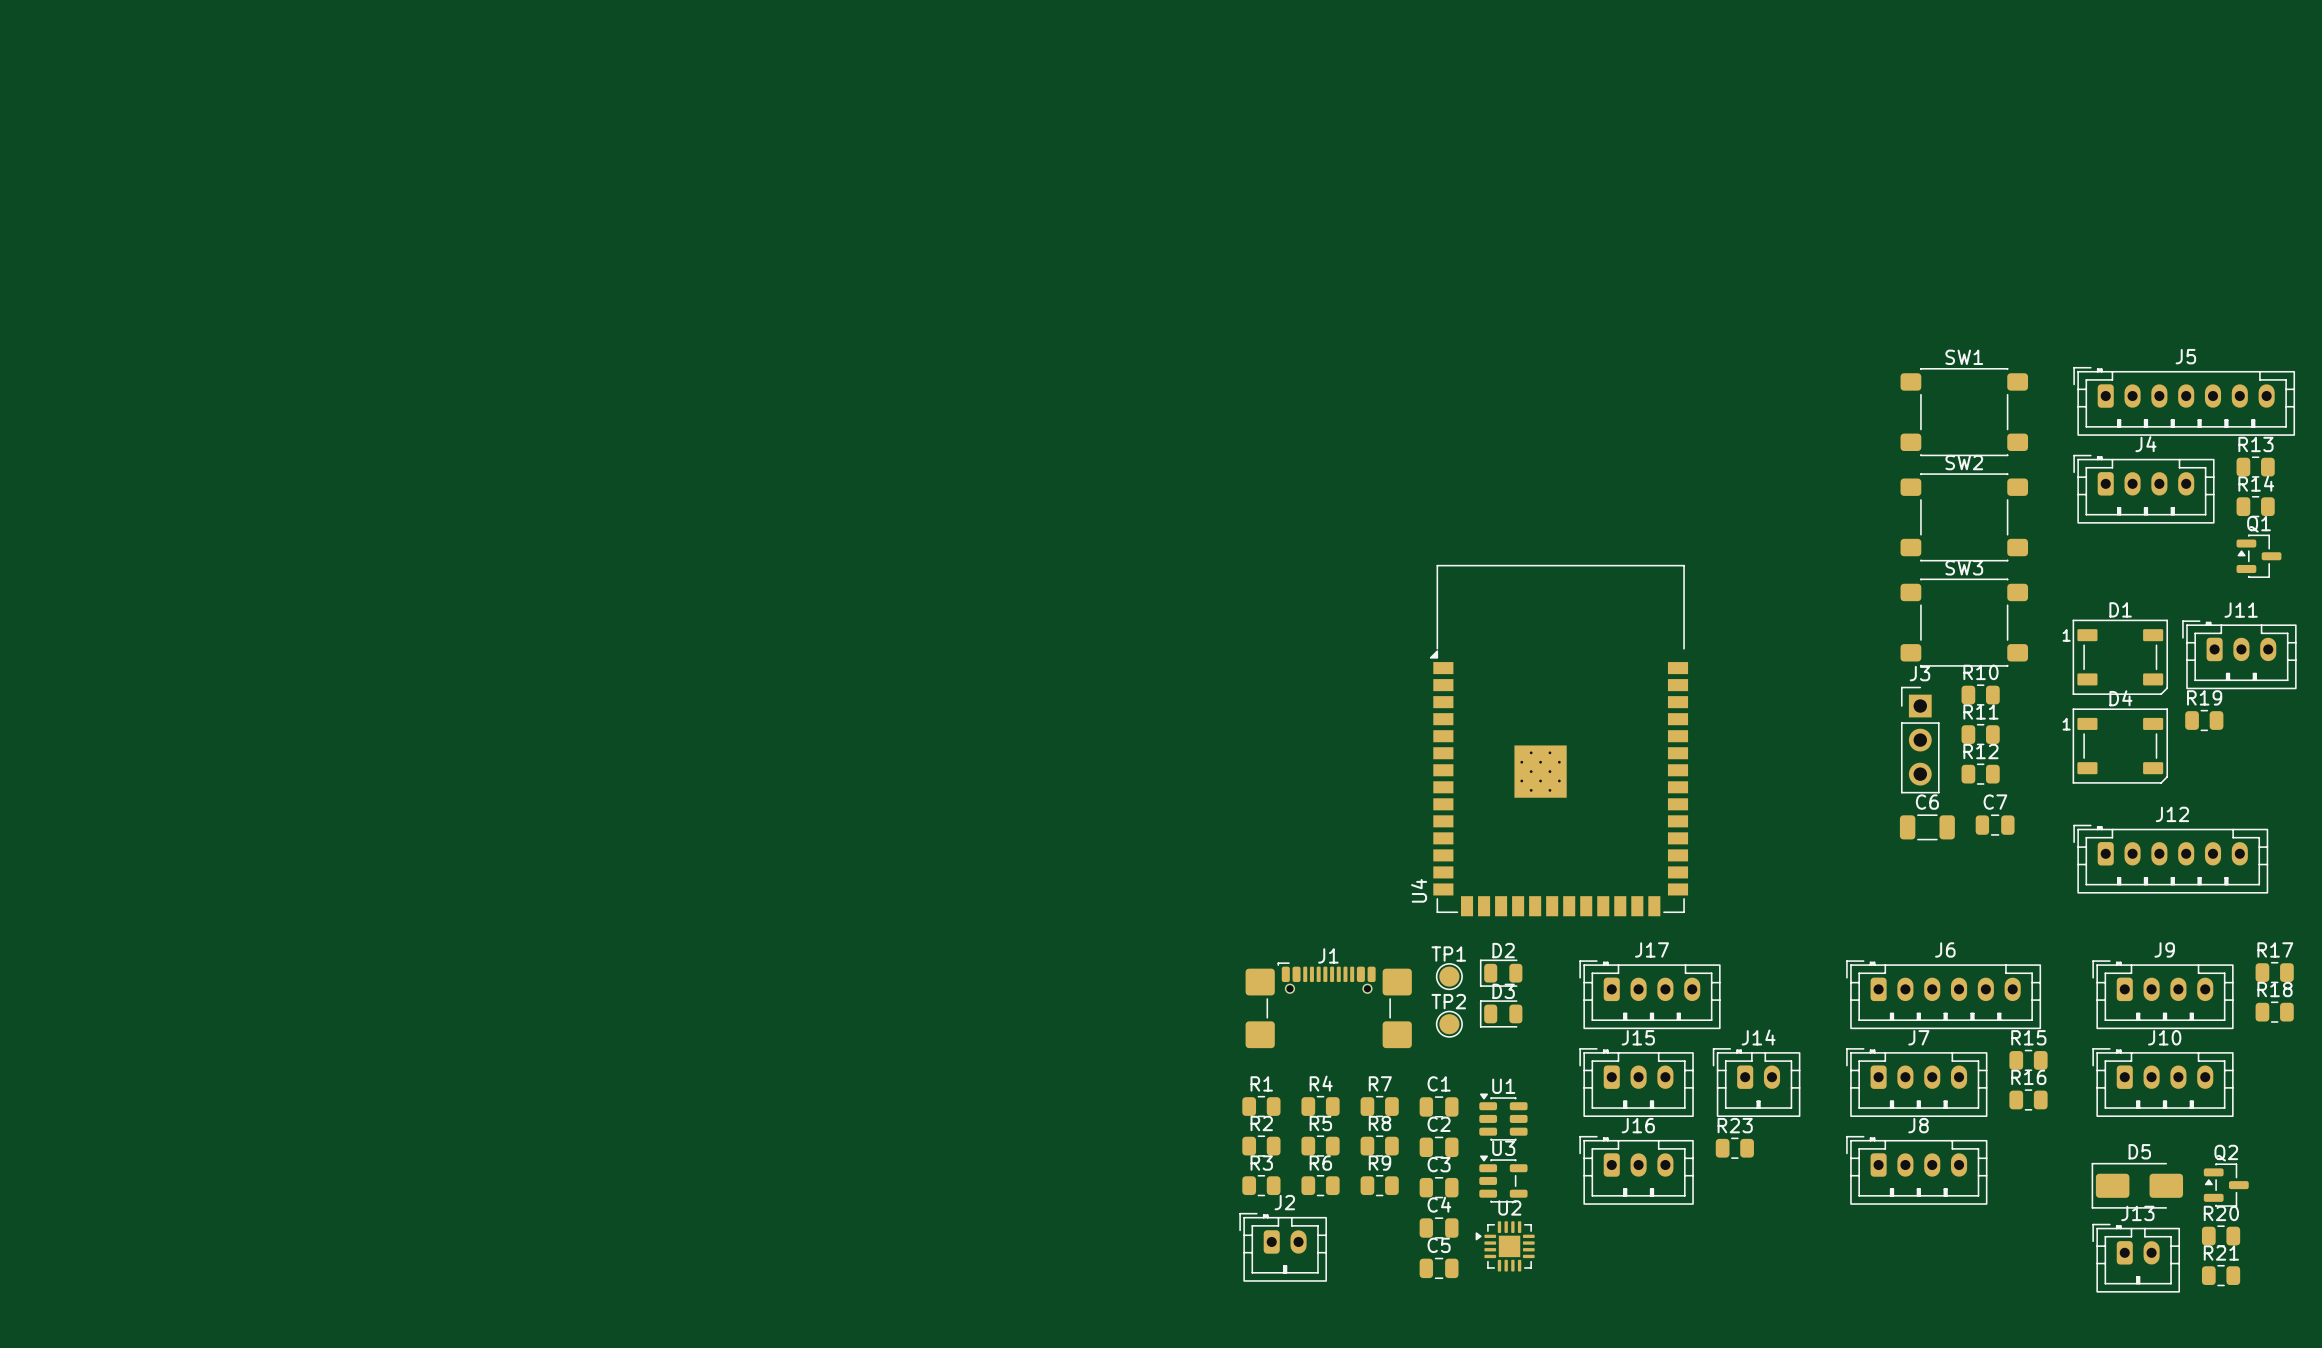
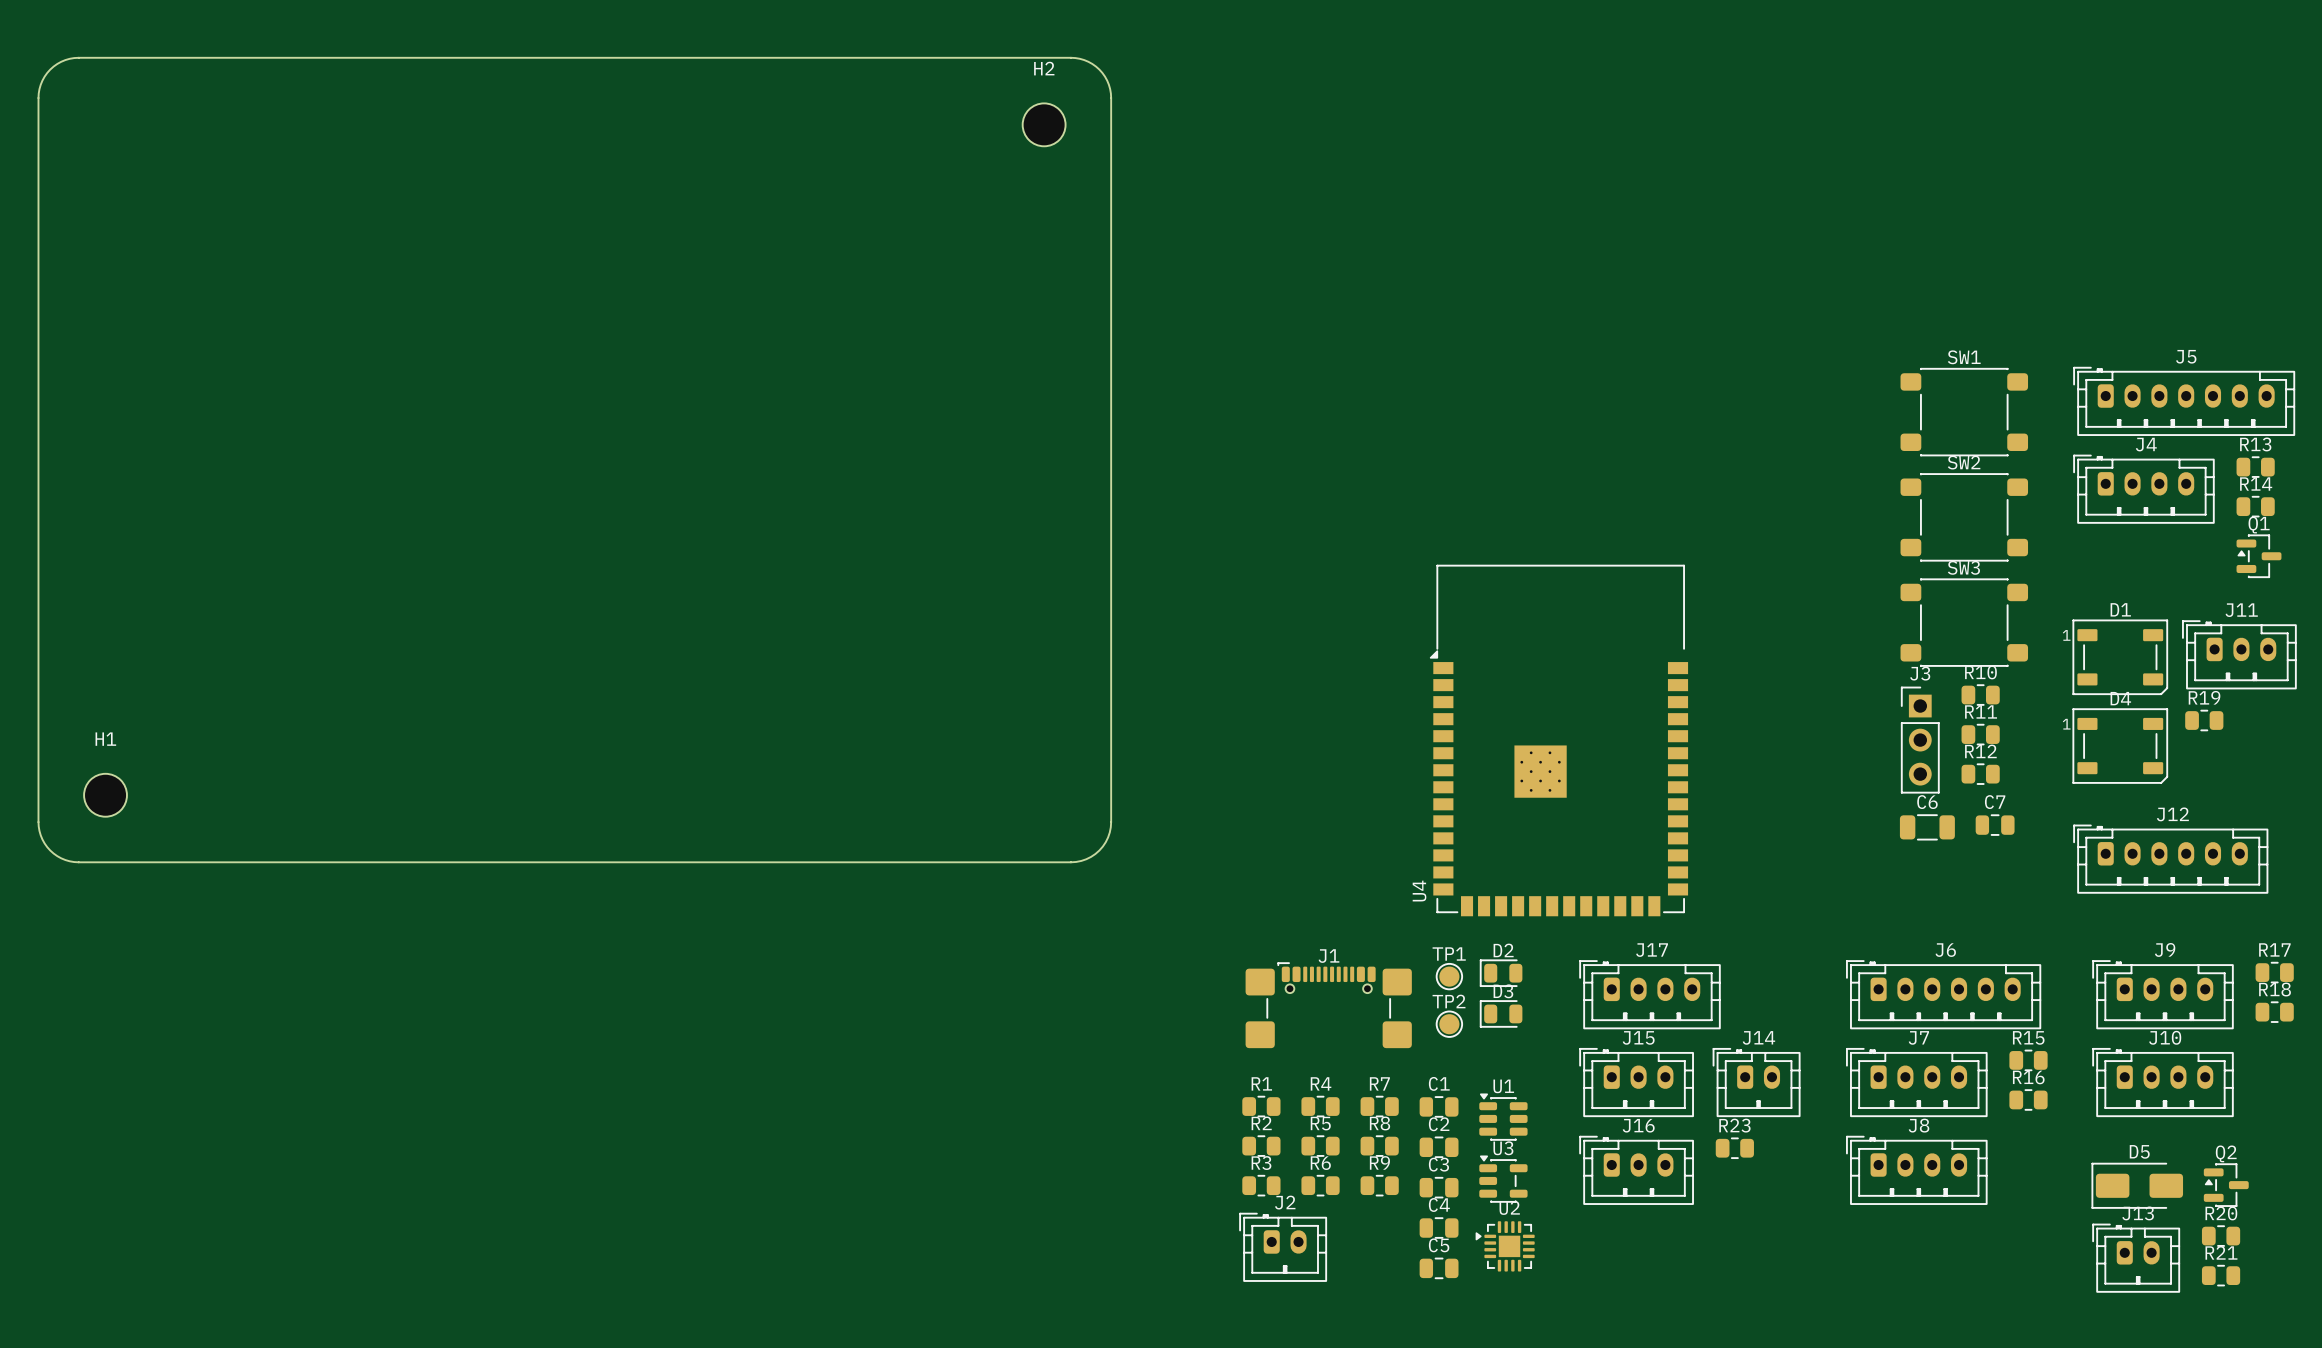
board edge: none -> (78, 57) (1070, 57) (1084, 60) (1096, 66) (1107, 80) (1111, 98) (1111, 822) (1108, 837) (1102, 846) (1086, 859) (1070, 862) (78, 862) (65, 860) (53, 853) (42, 839) (38, 822) (38, 98) (40, 84) (50, 69) (65, 60) (78, 57)
H2: none -> (1044, 124)
H1: none -> (105, 795)

